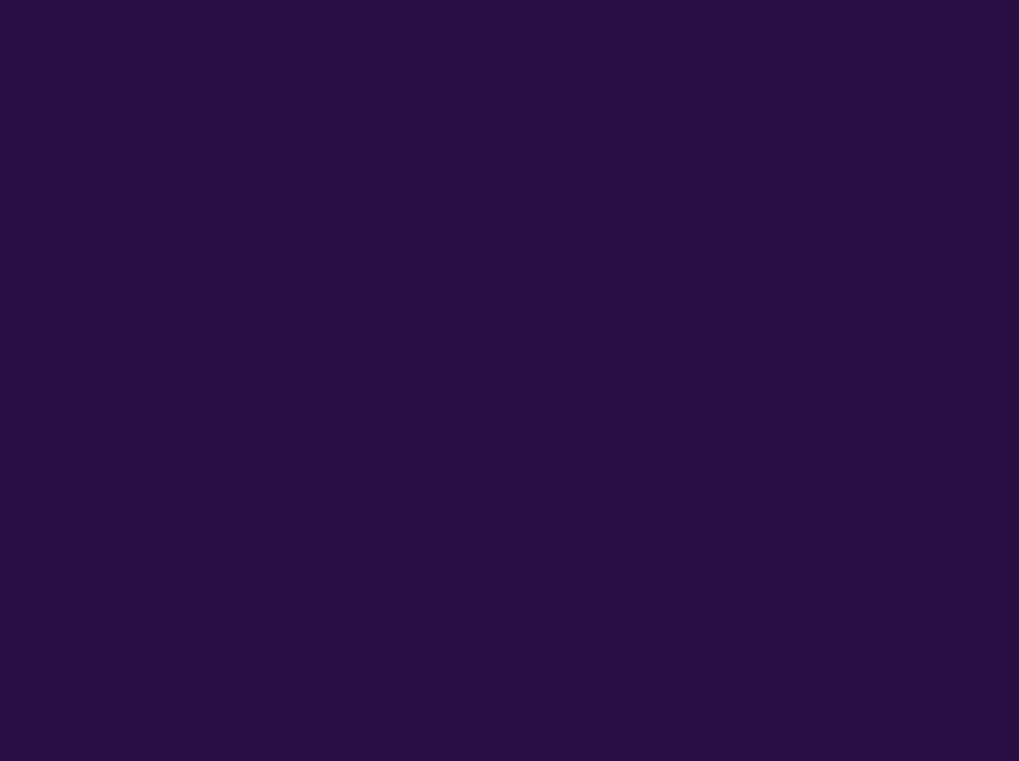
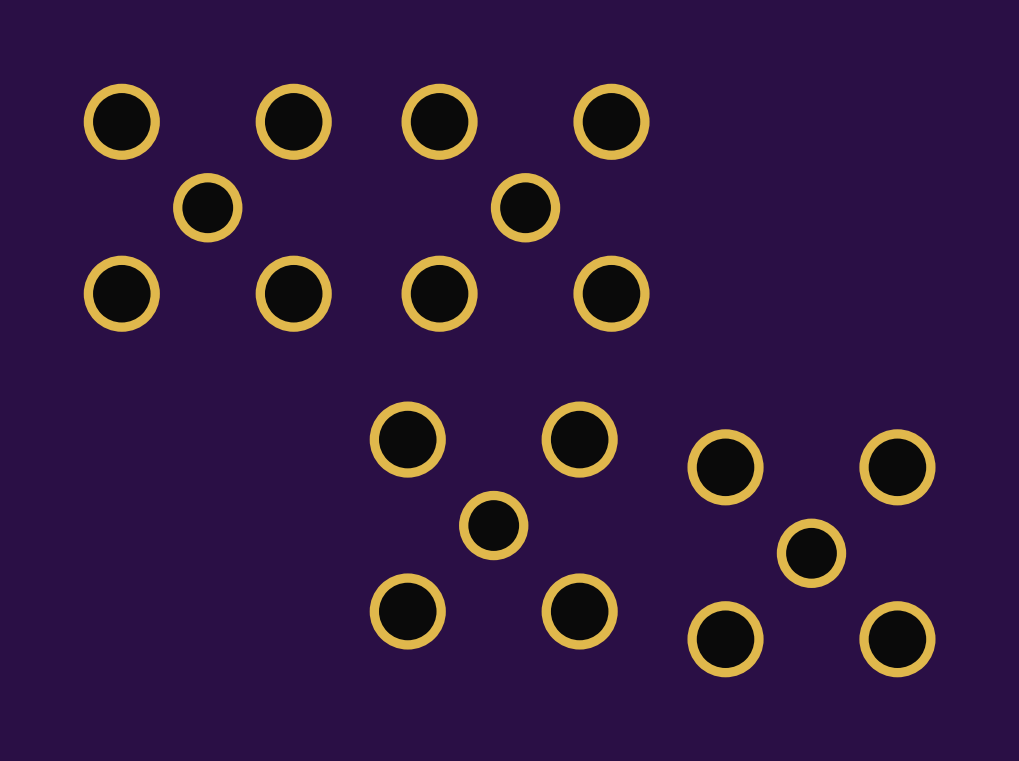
part: none -> (207, 207)
part: none -> (525, 207)
part: none -> (493, 525)
part: none -> (811, 553)

